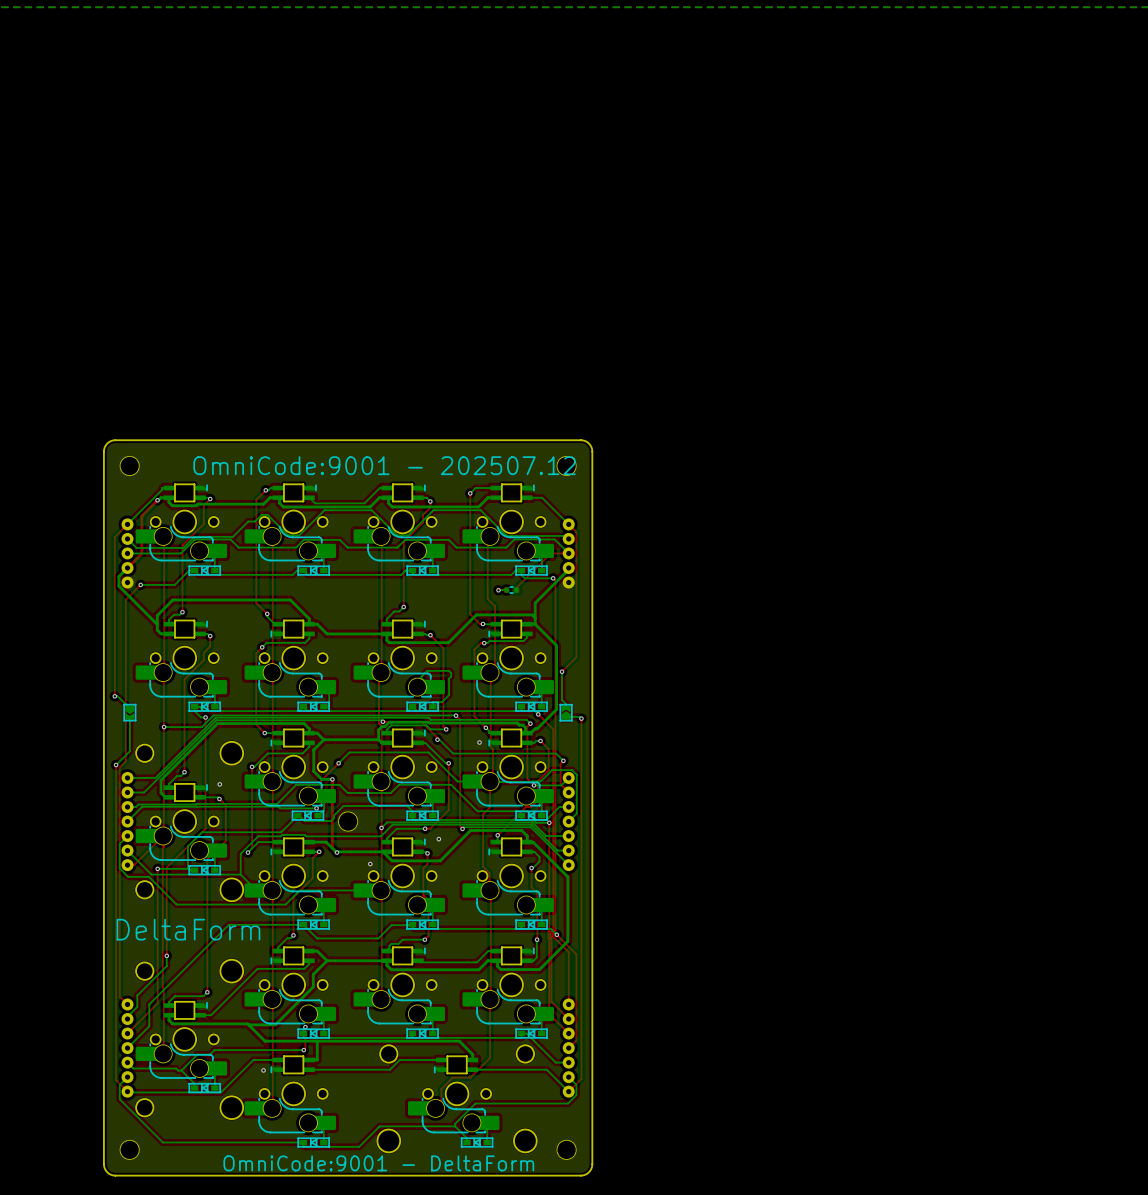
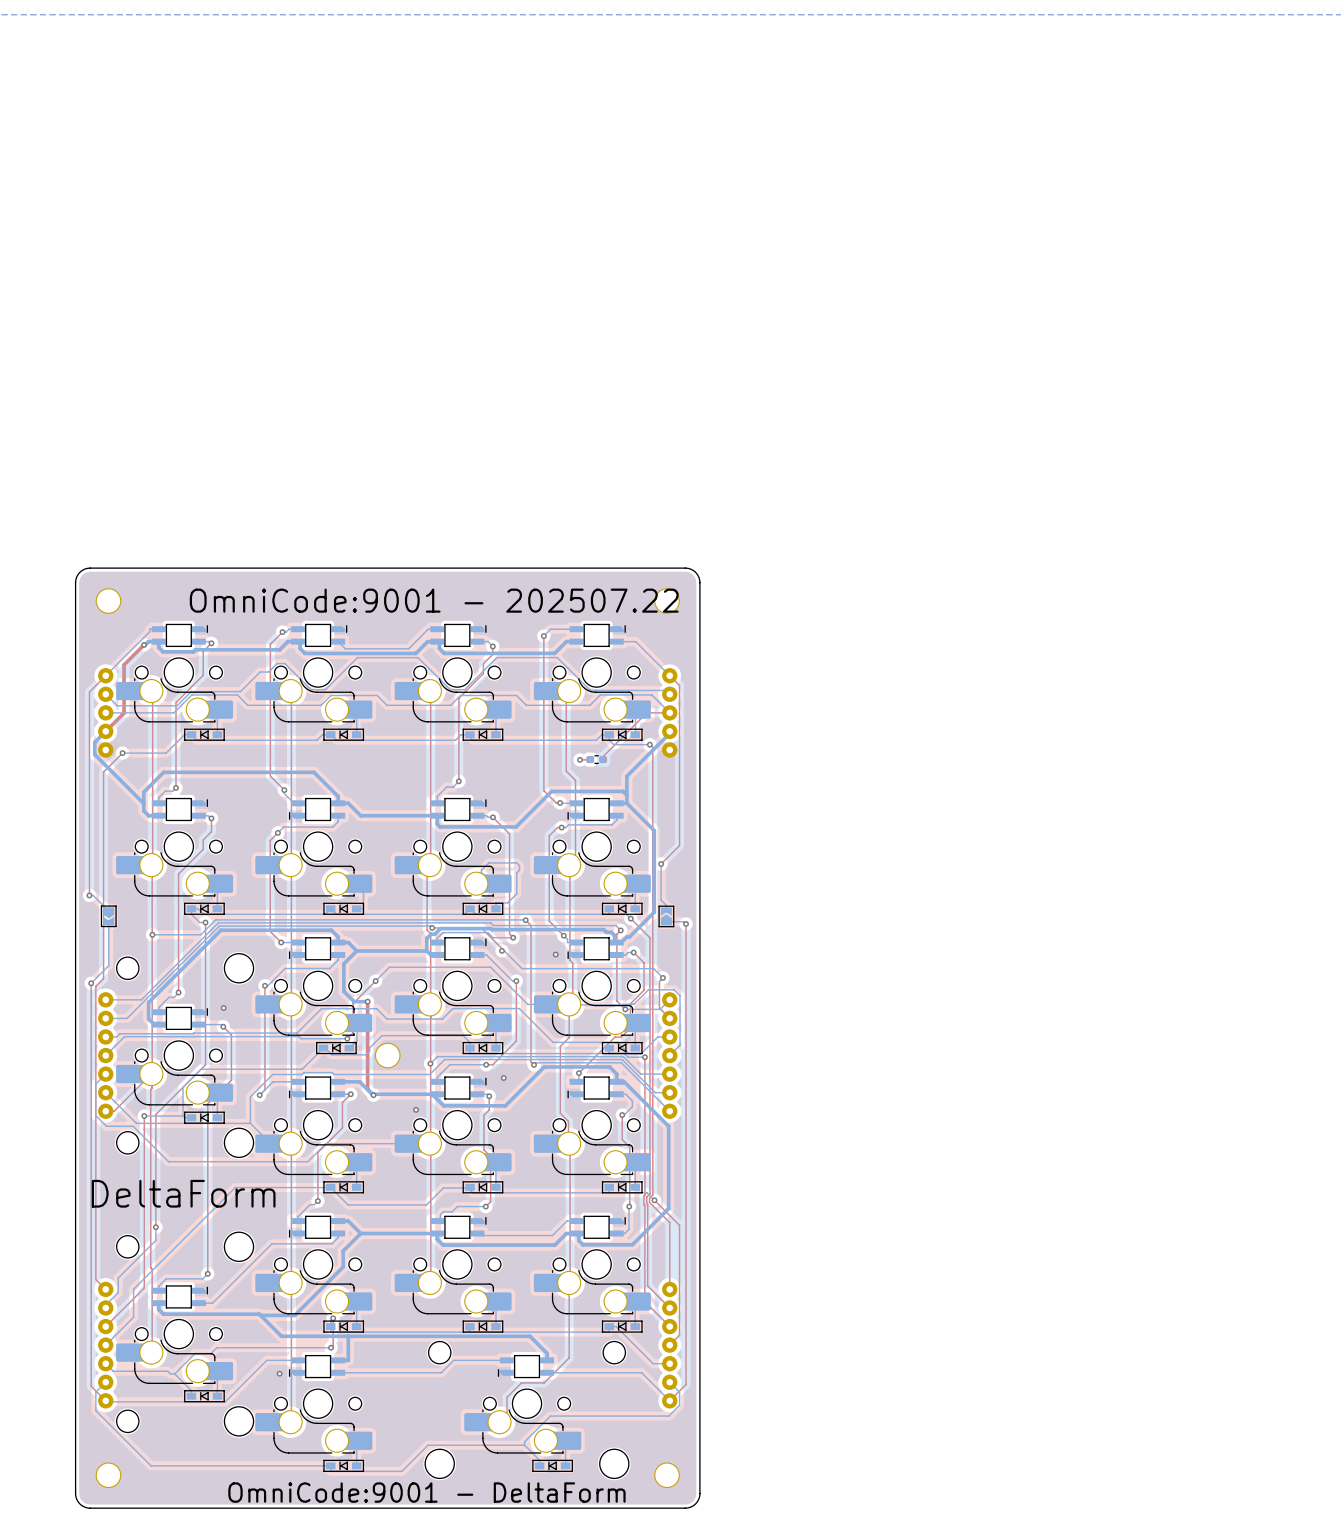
text: OmniCode:9001 - 202507.12 (384, 465) -> OmniCode:9001 - 202507.22 (434, 600)

